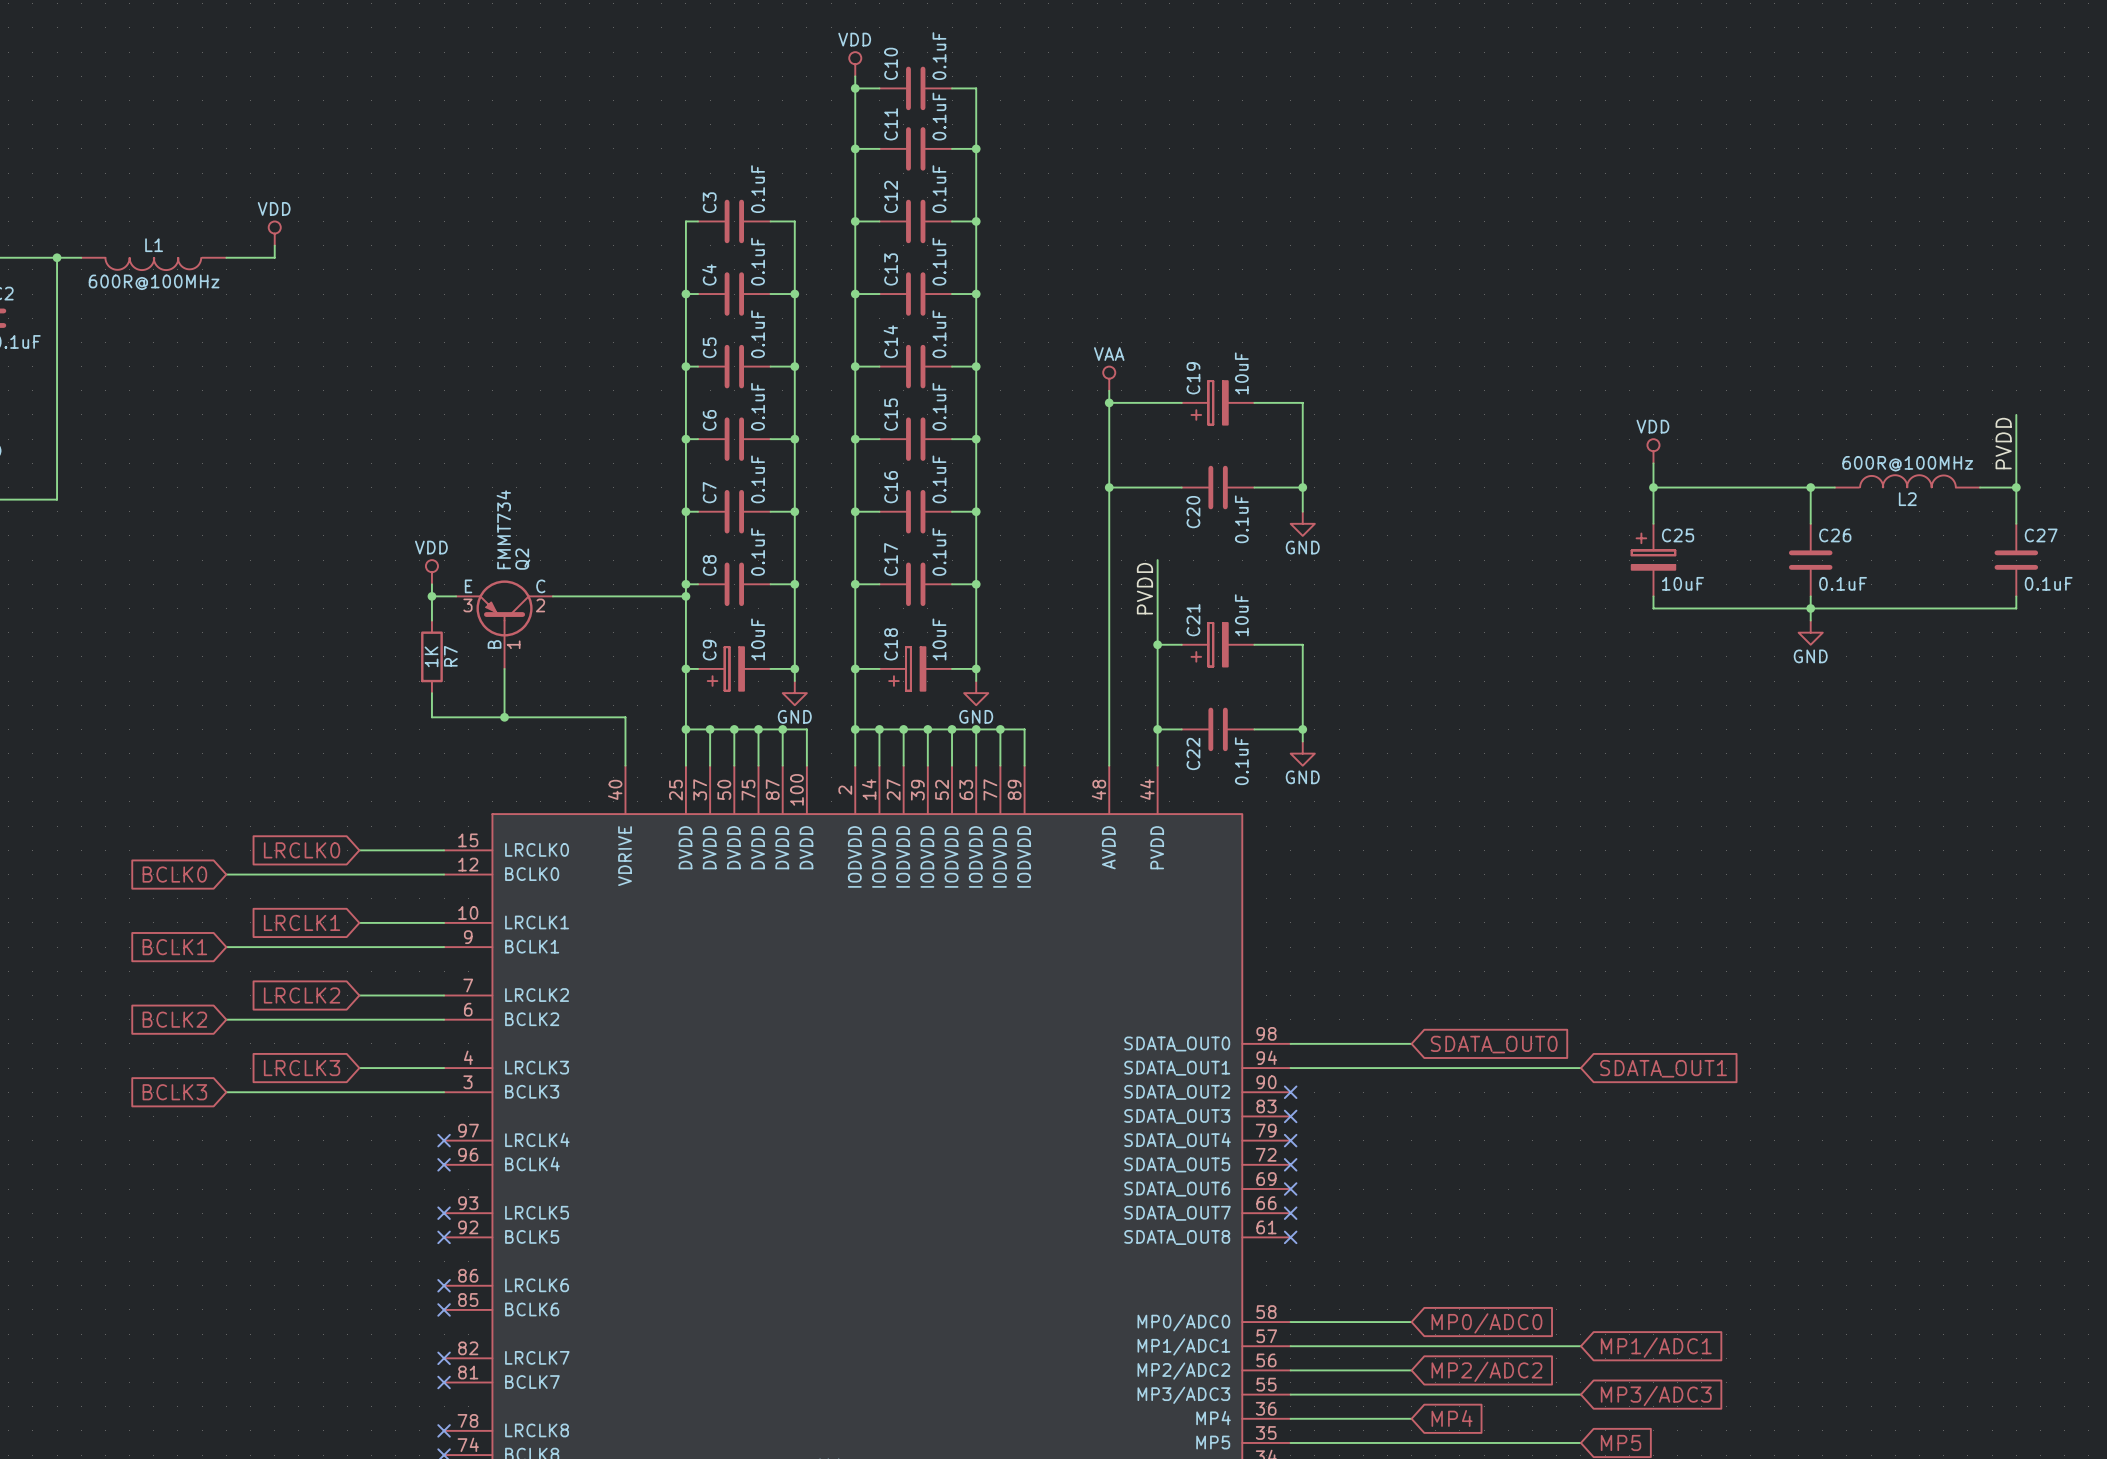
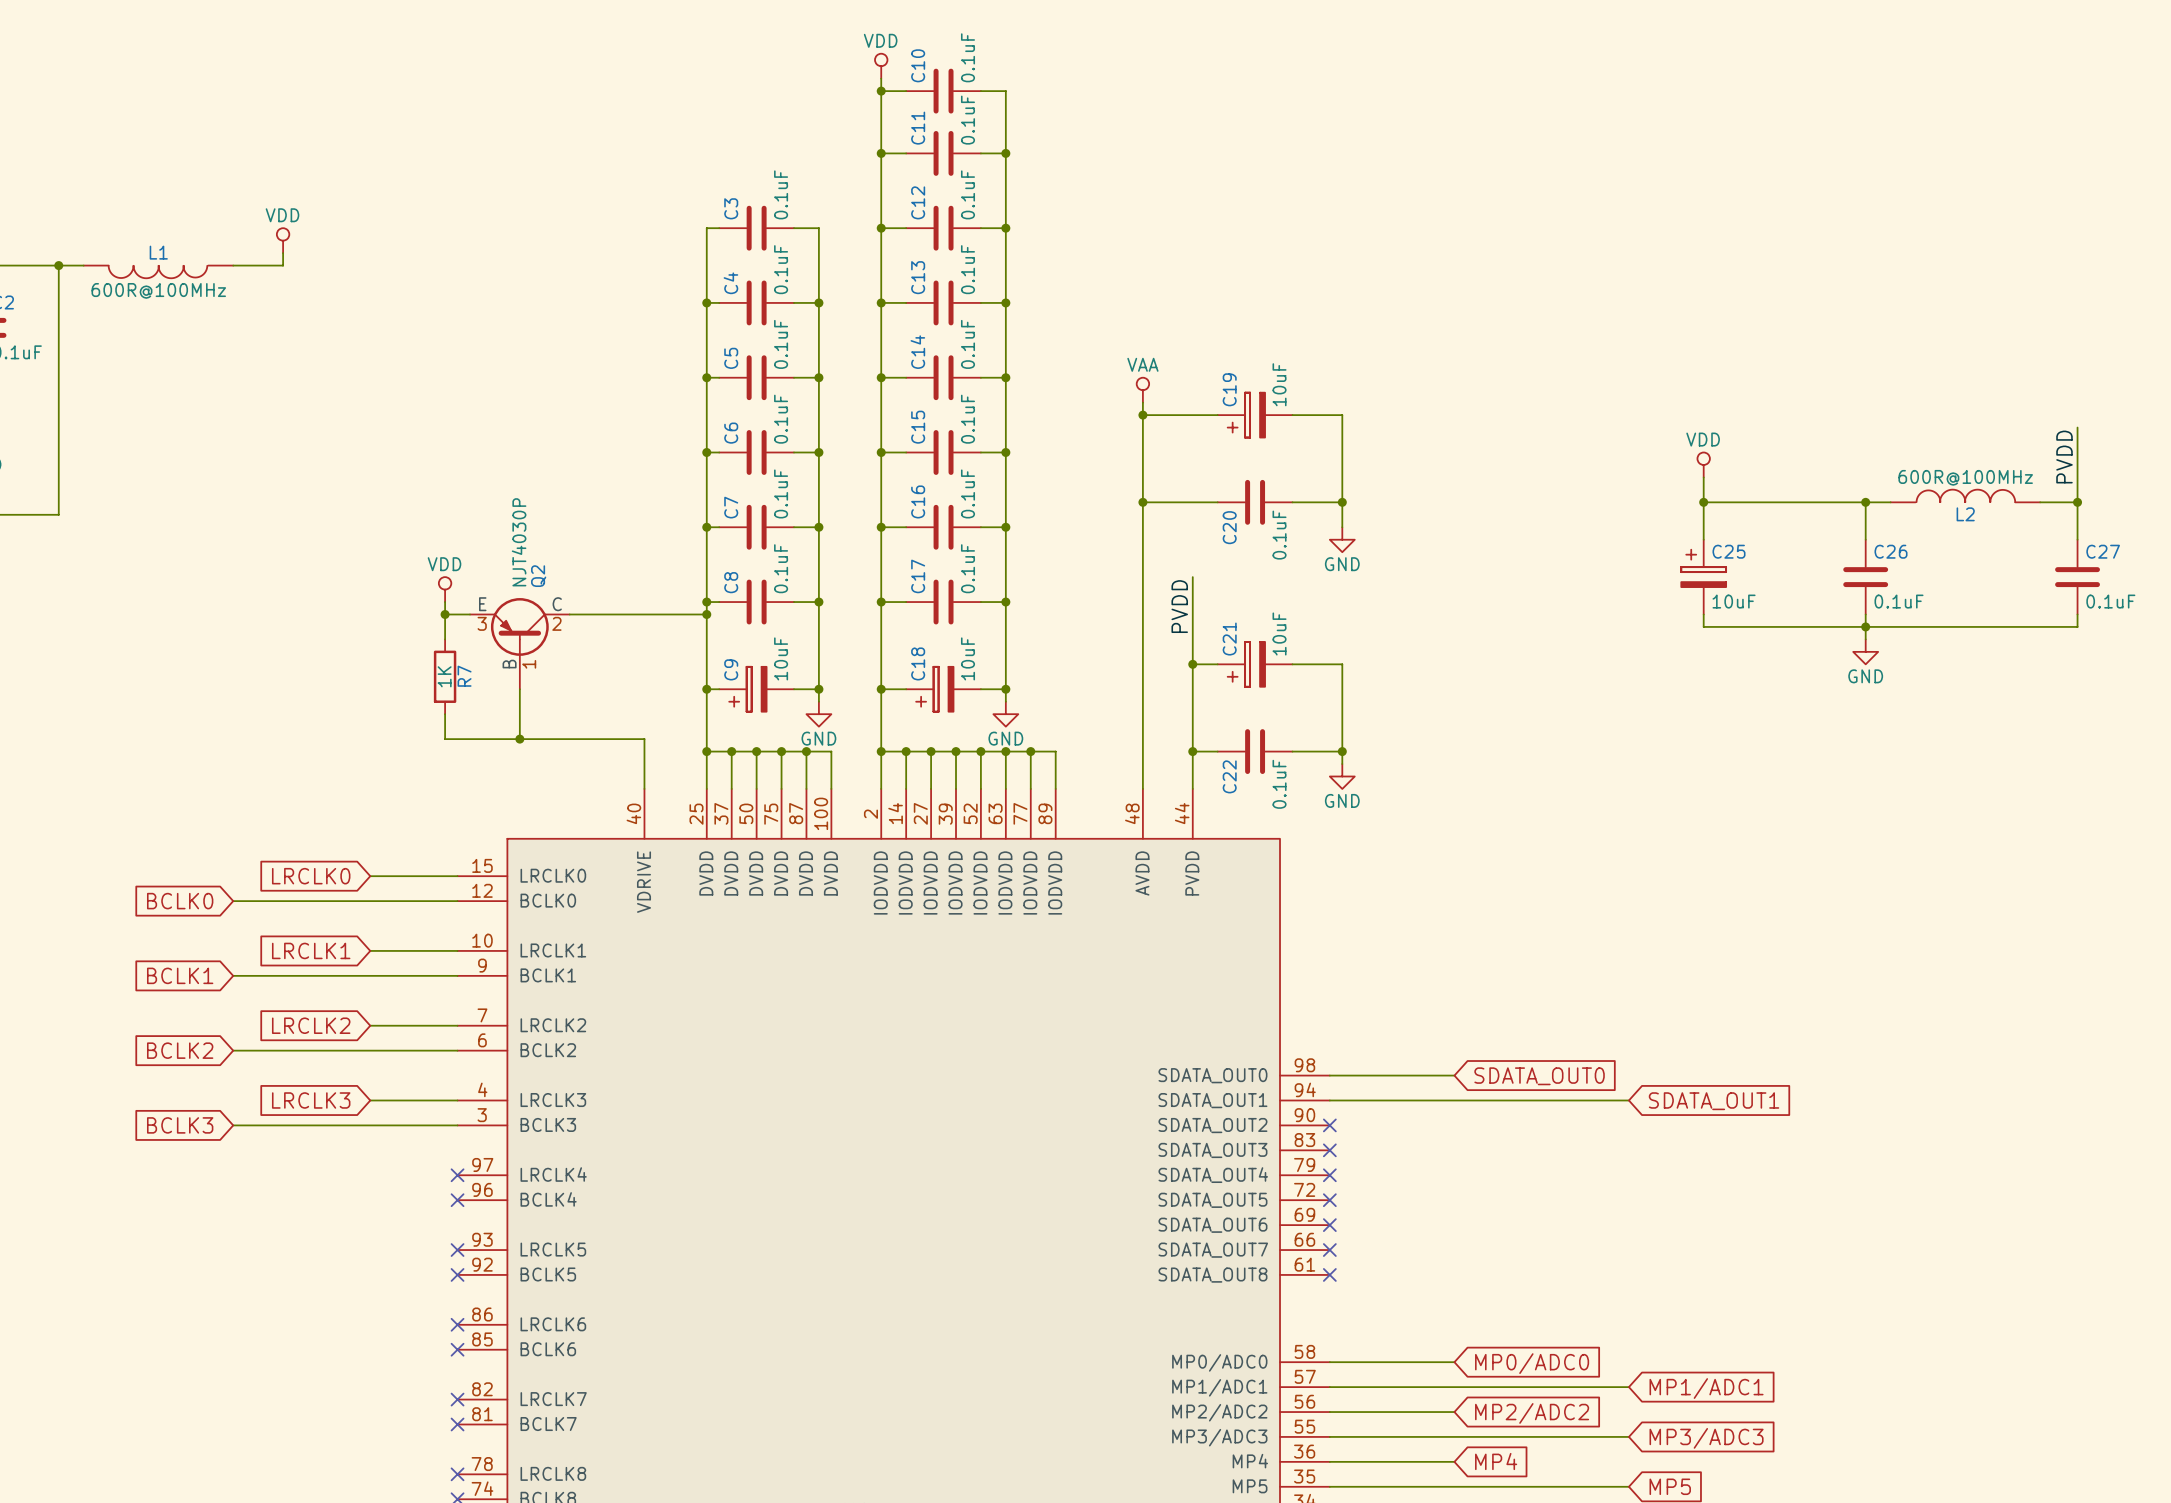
Q2 value: FMMT734 (503, 529) -> NJT4030P (519, 542)

